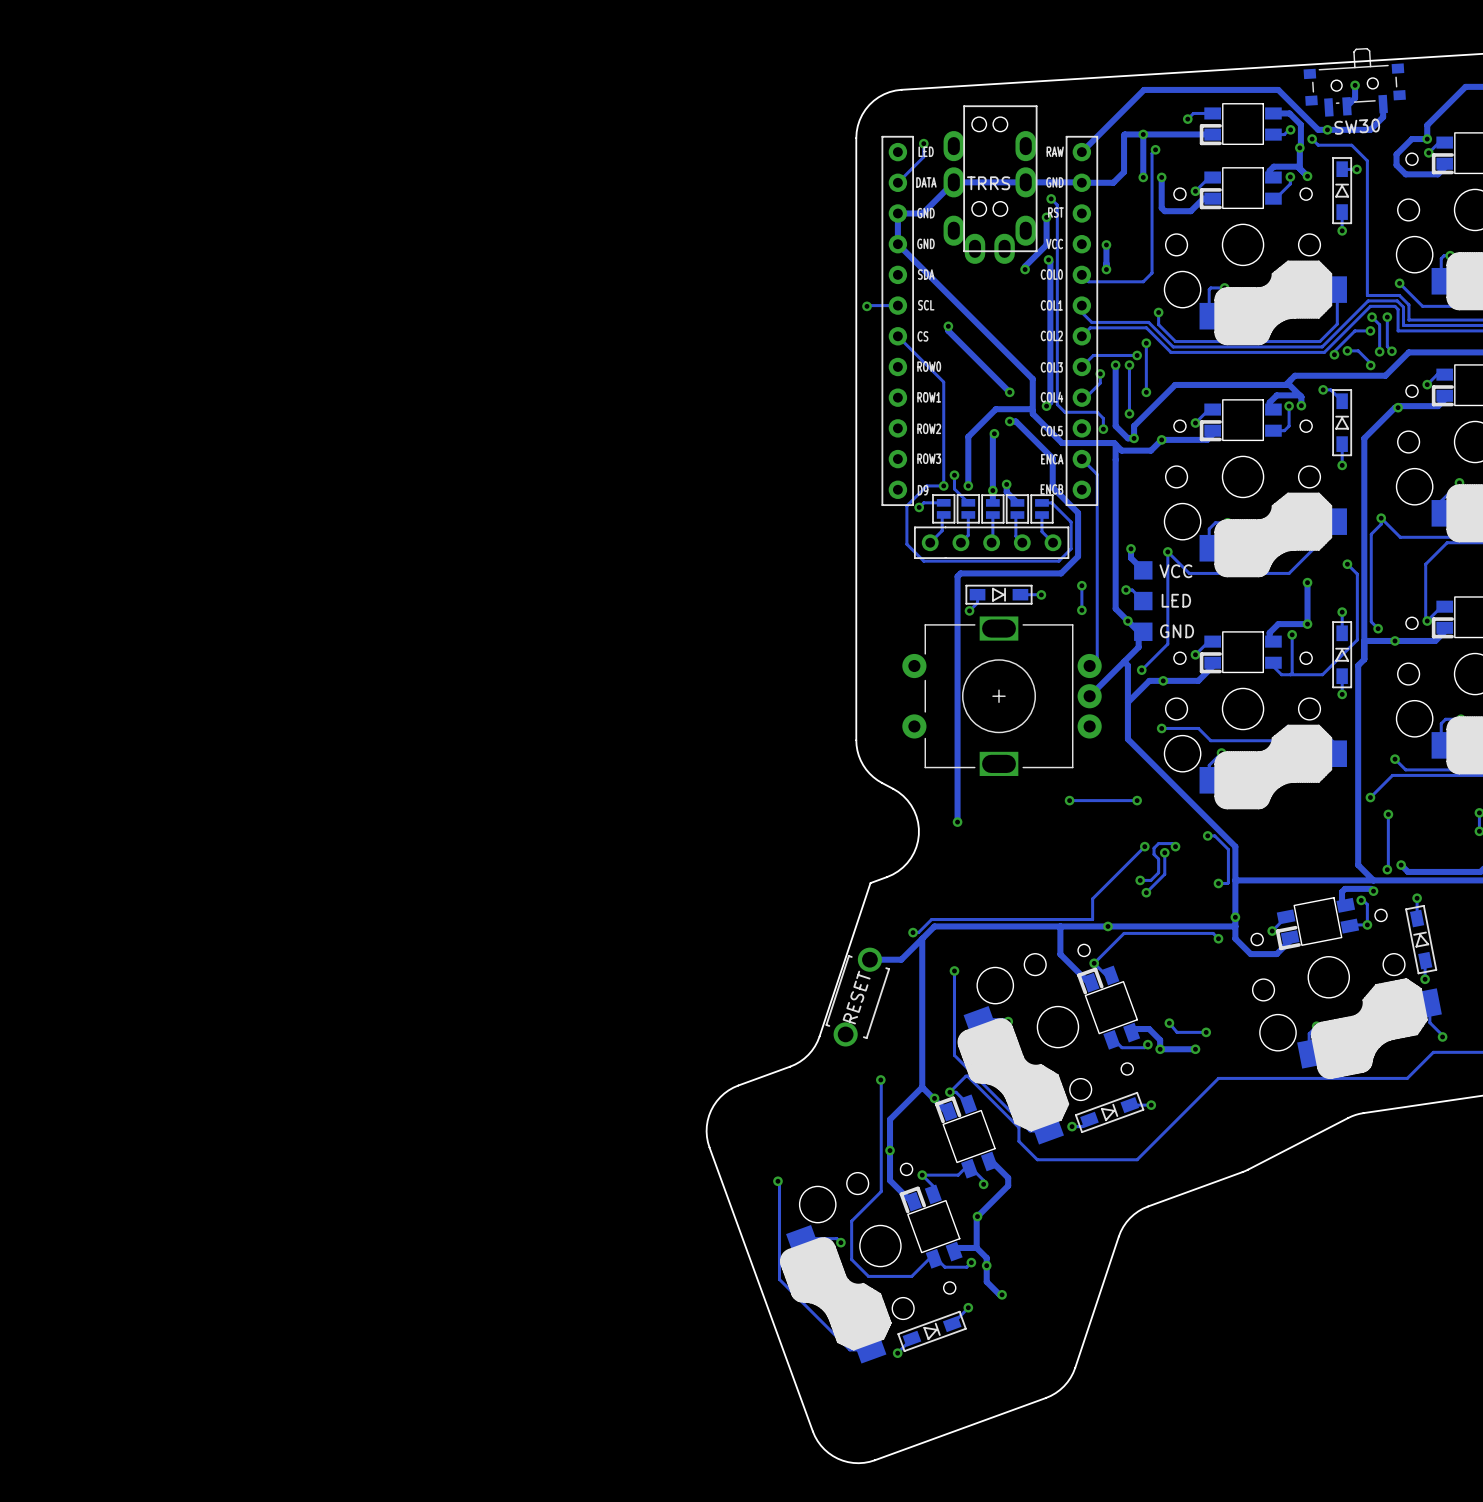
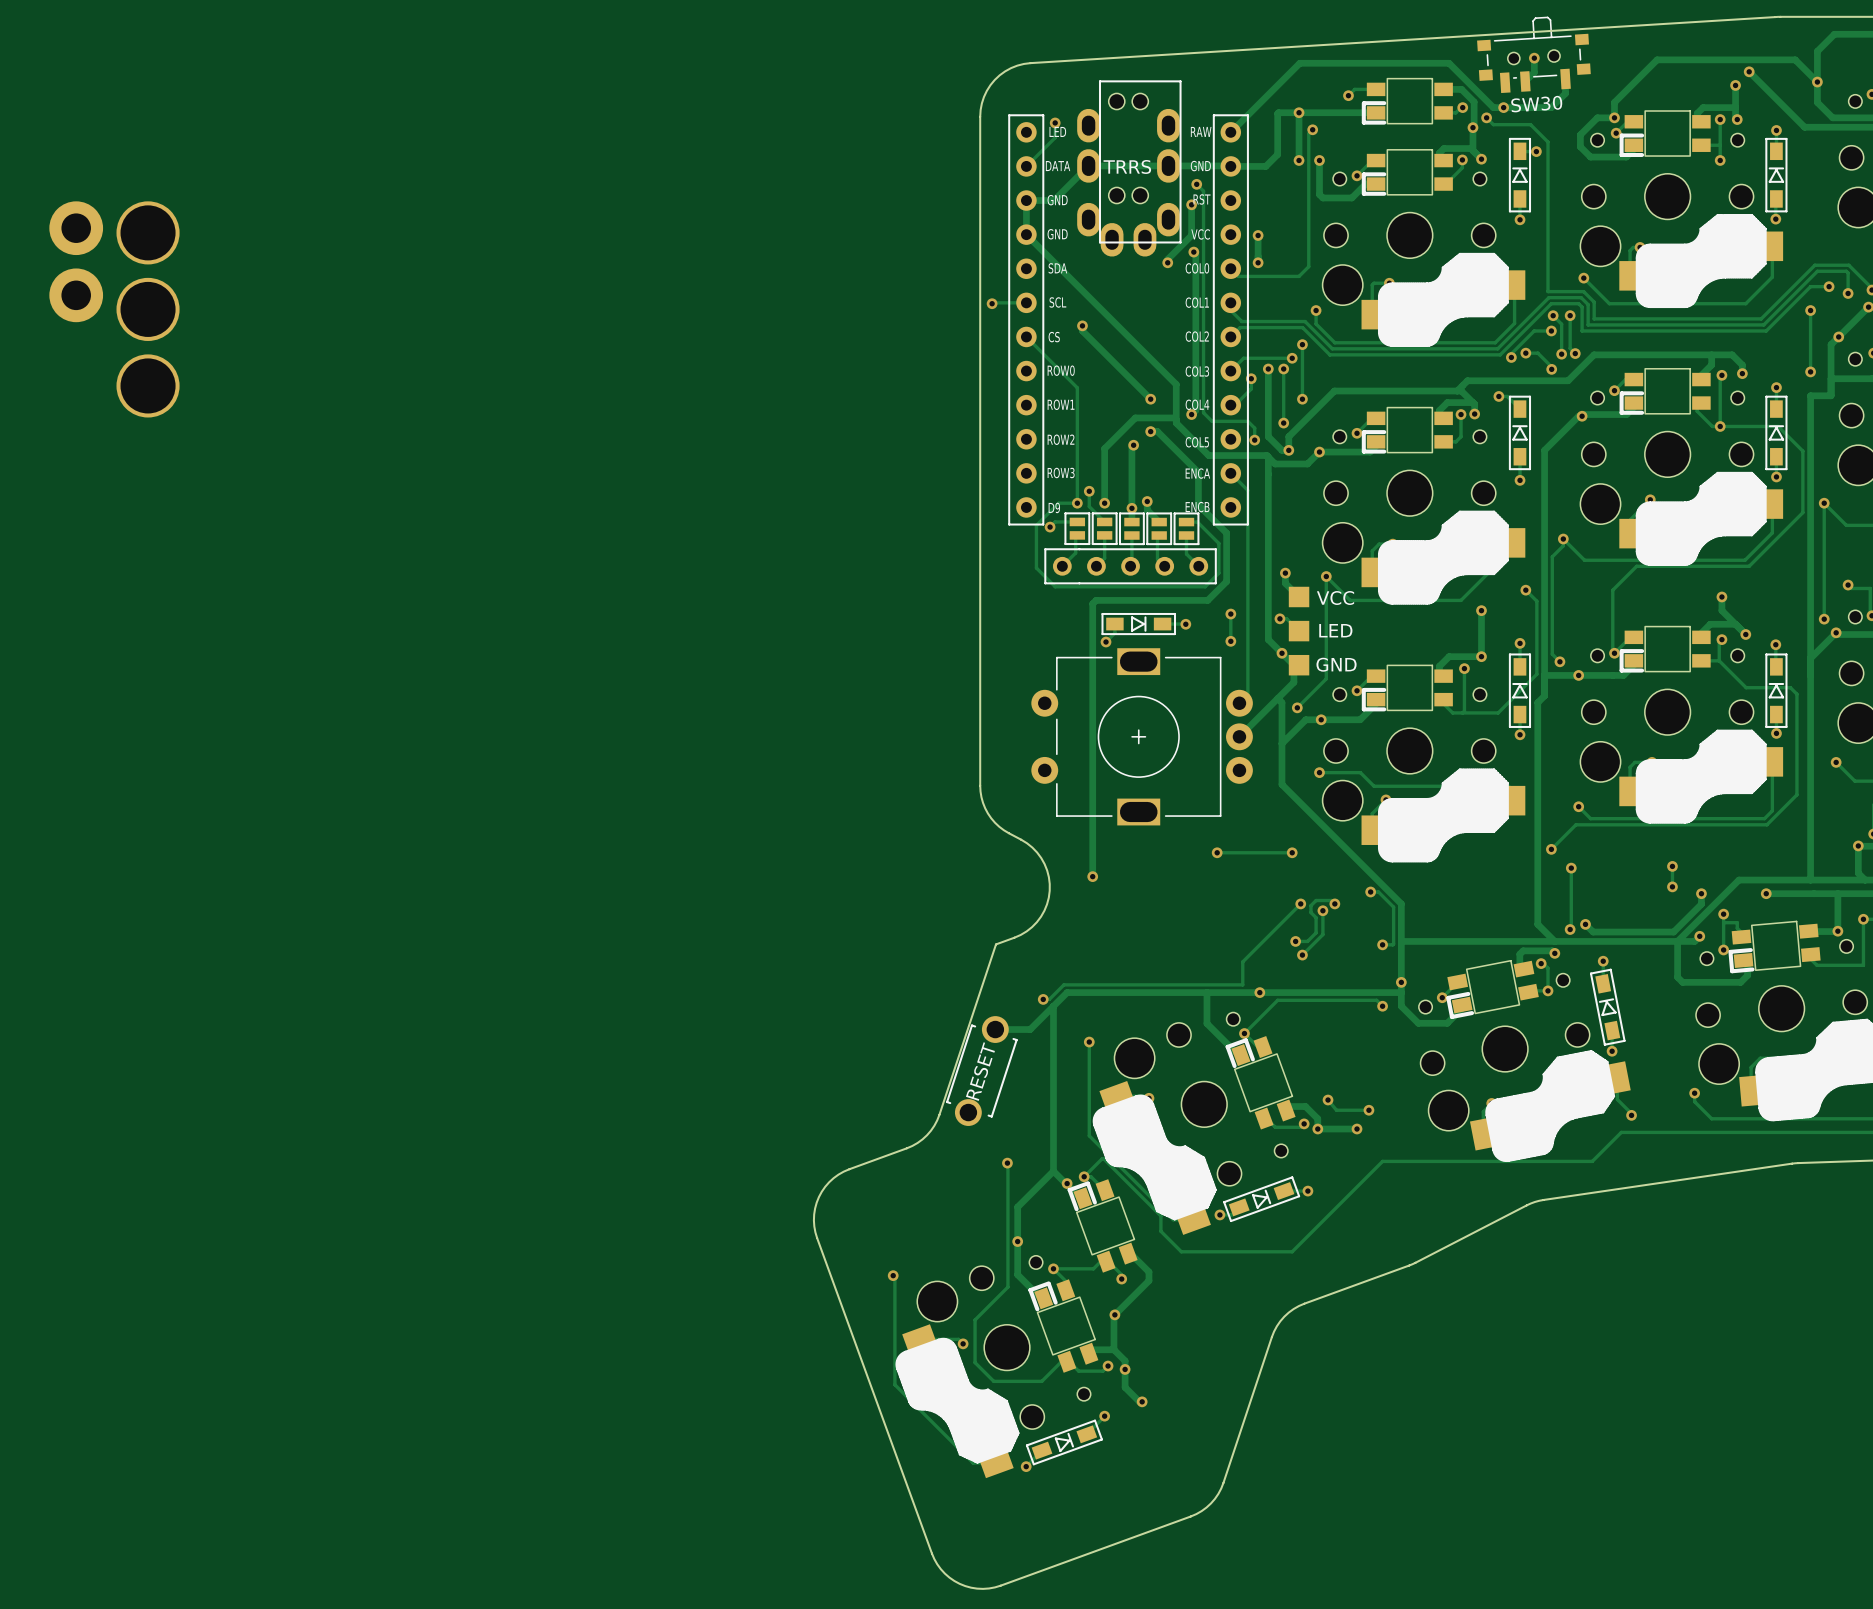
part: none -> (76, 228)
part: none -> (148, 232)
part: none -> (76, 295)
part: none -> (148, 309)
part: none -> (148, 385)

